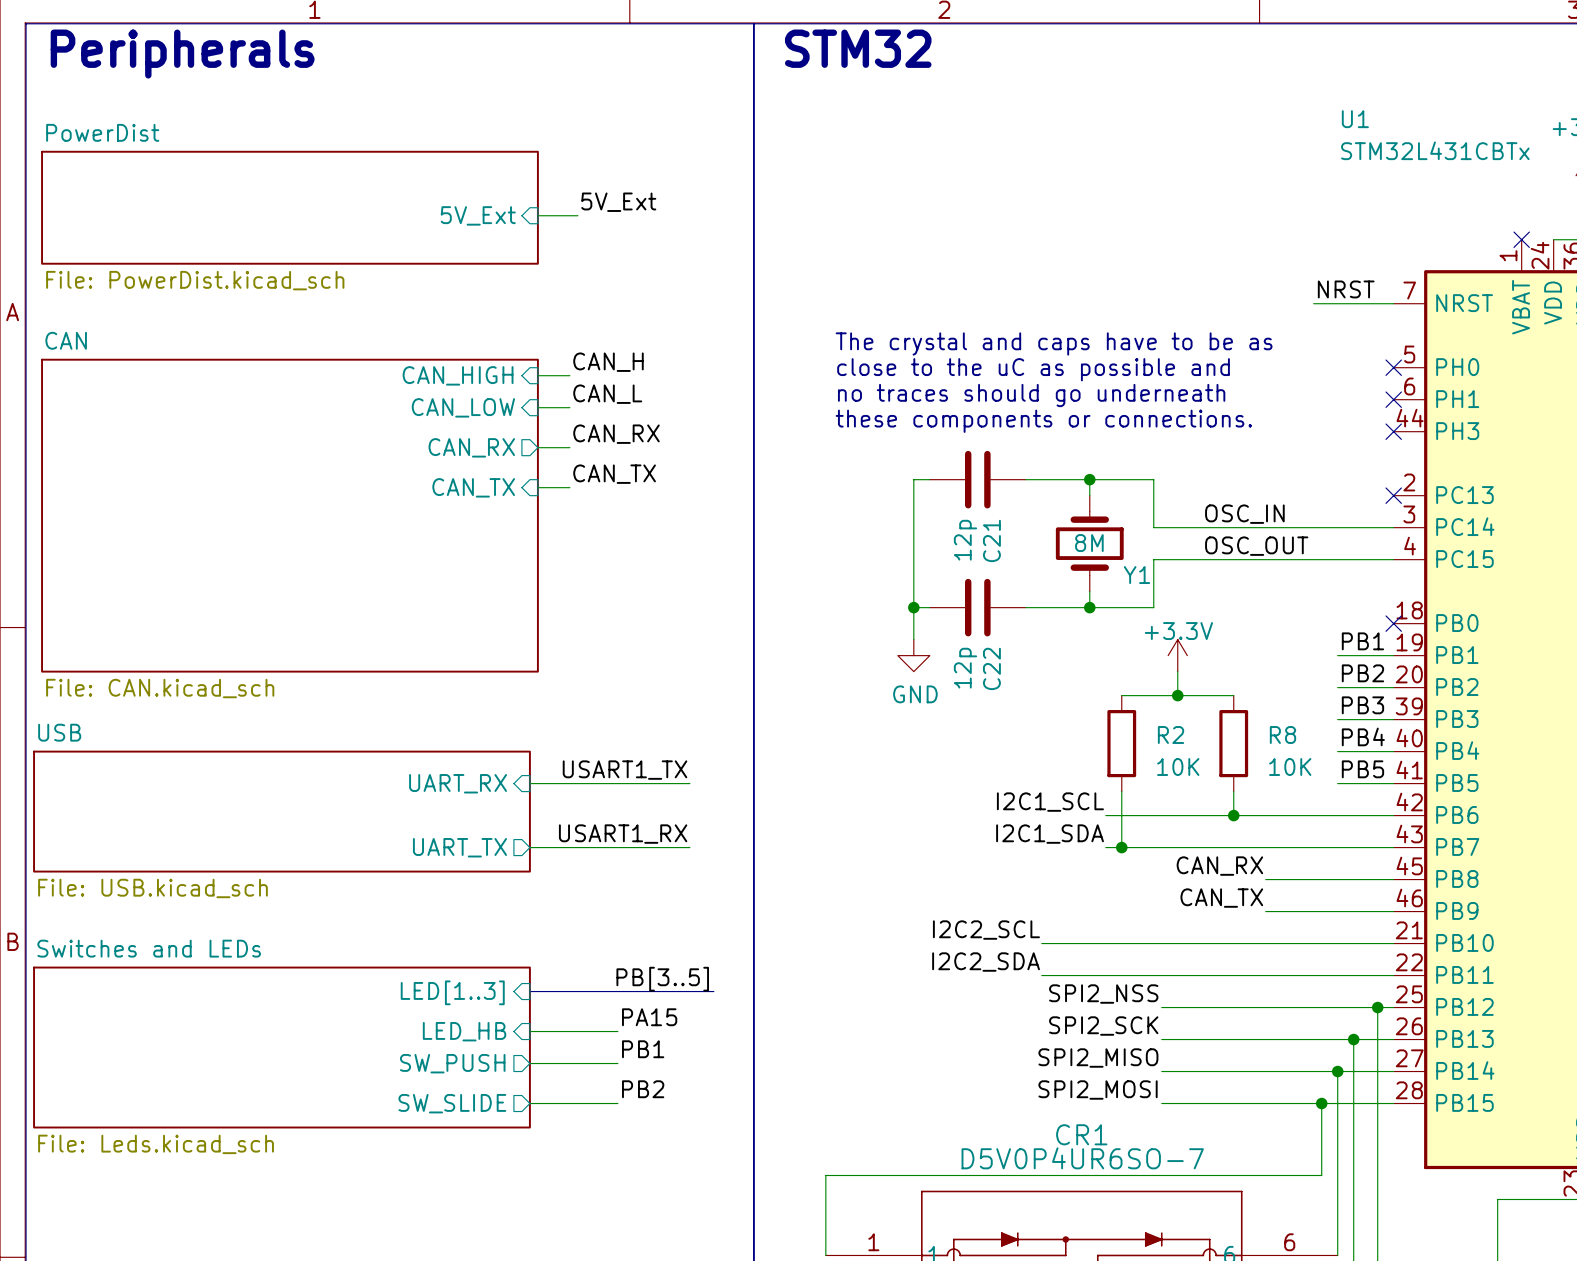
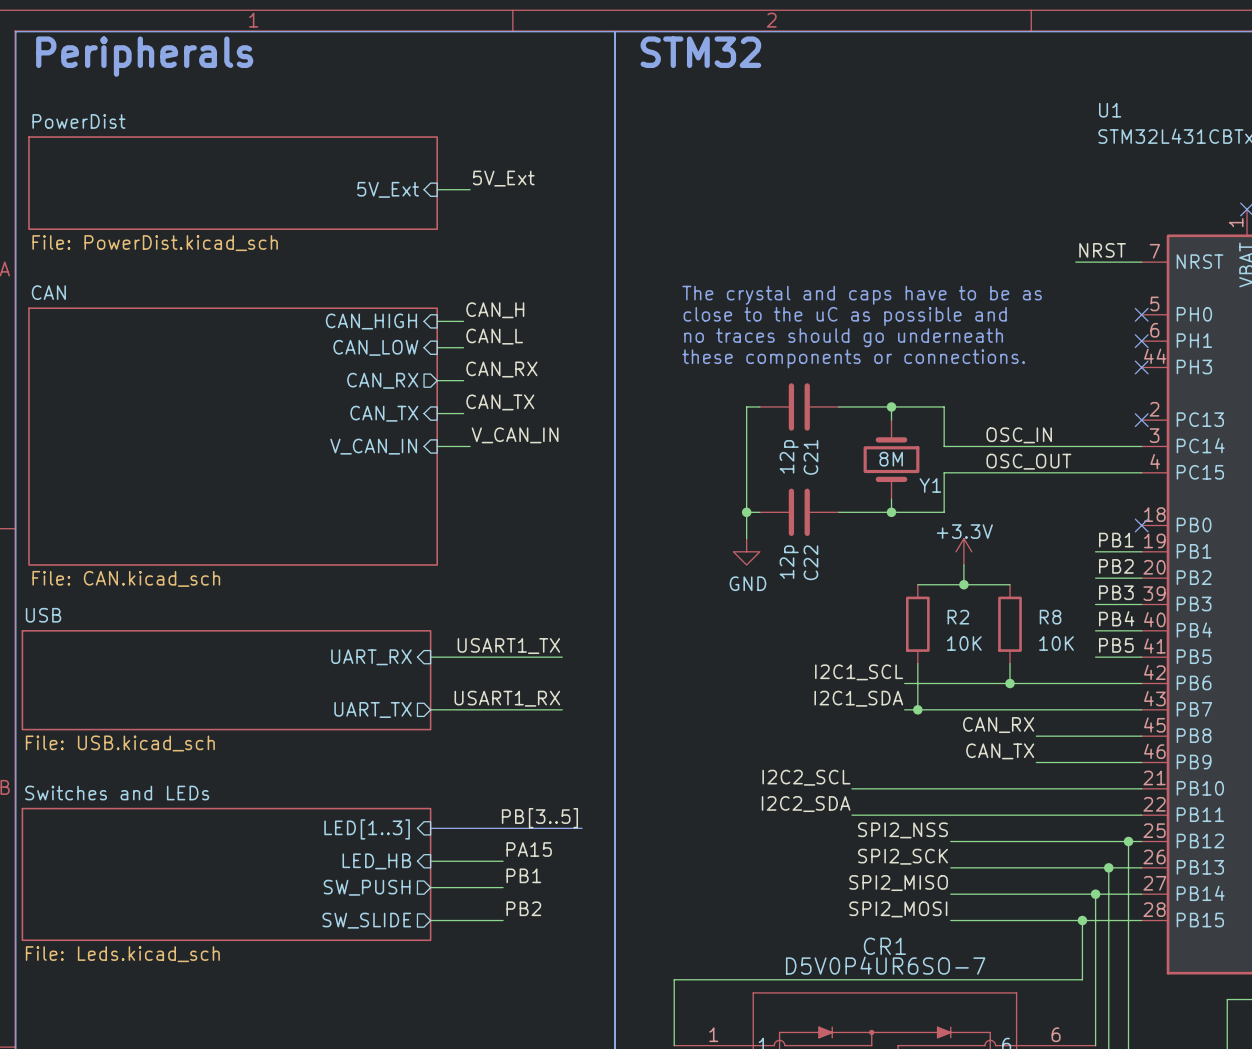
label: none -> V_CAN_IN (515, 435)
sheet pin: none -> V_CAN_IN (373, 446)
wire: none -> (437, 446) (470, 446)

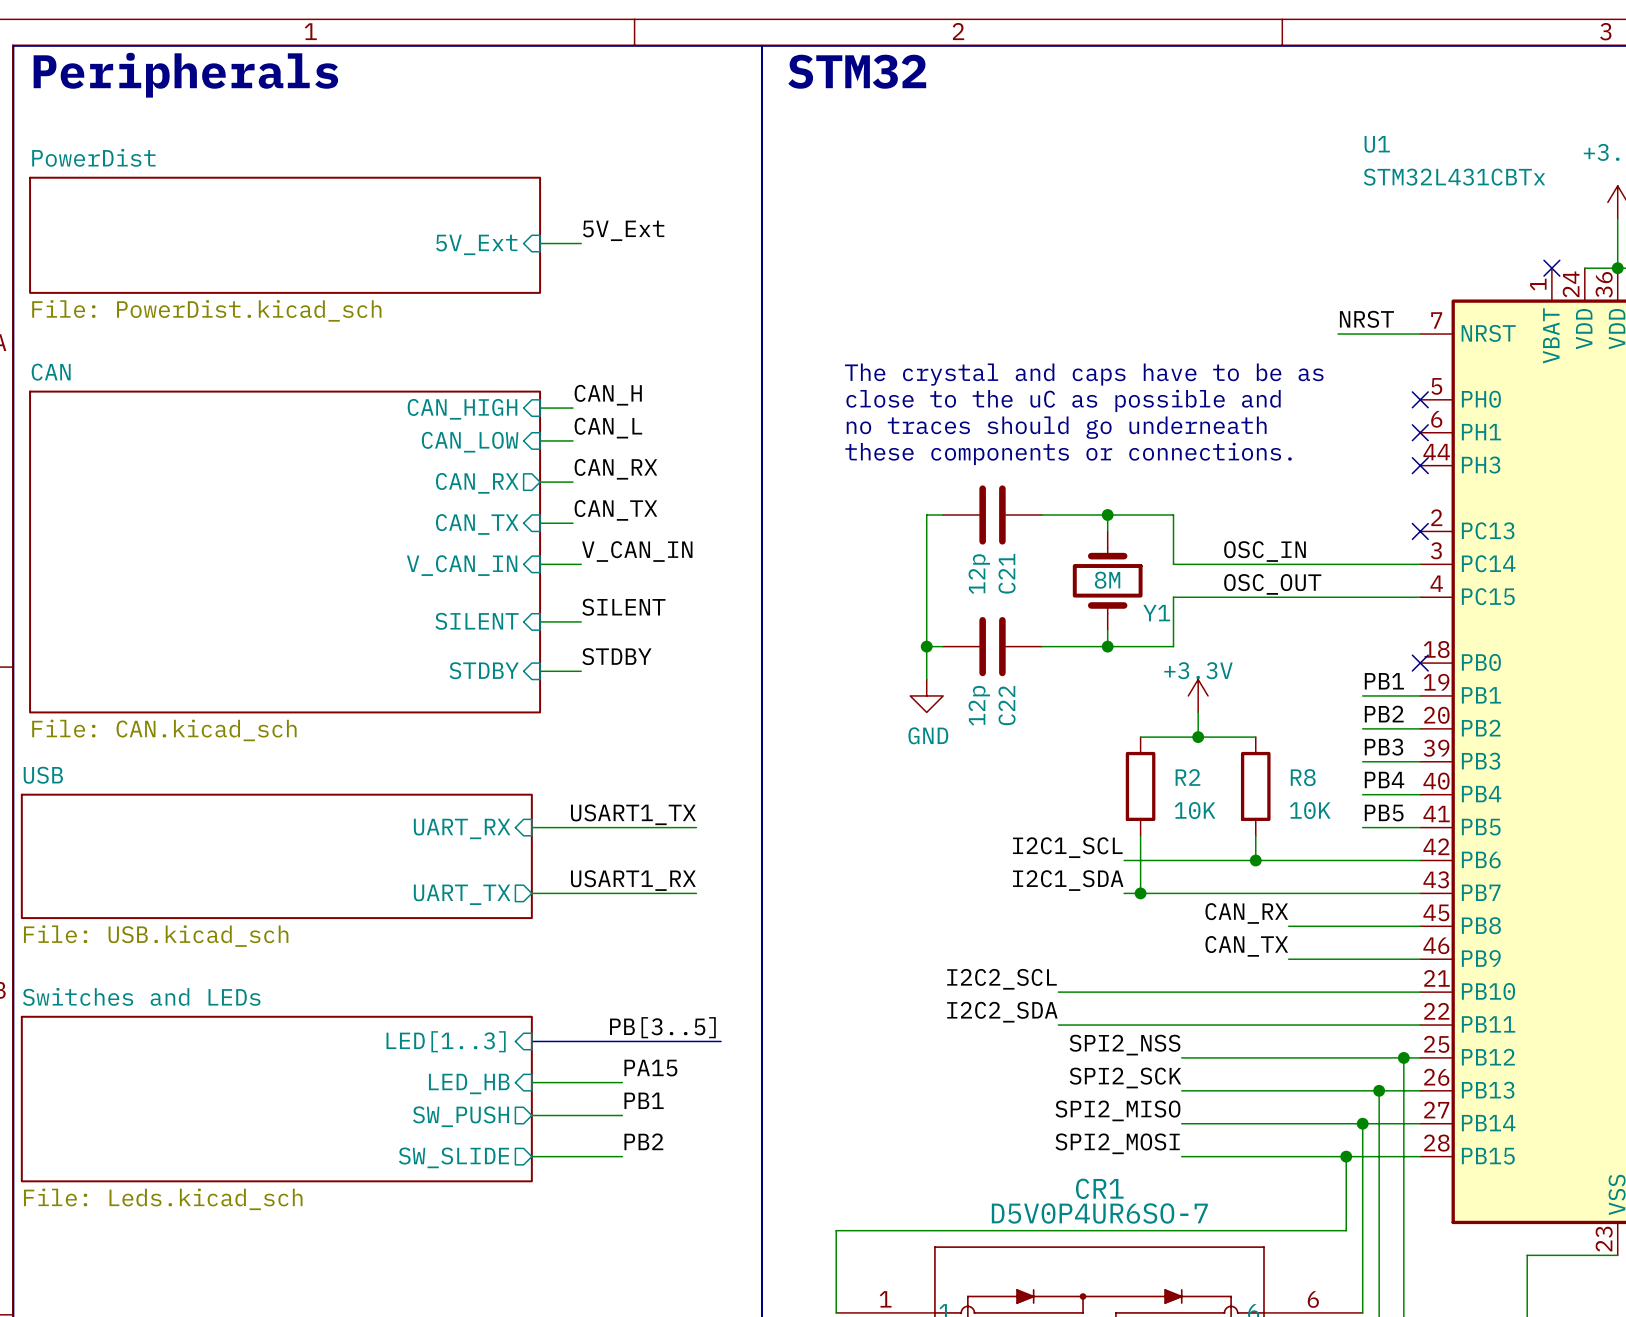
label: none -> SILENT (623, 607)
sheet pin: none -> SILENT (476, 621)
wire: none -> (540, 621) (581, 621)
label: none -> STDBY (616, 656)
sheet pin: none -> STDBY (484, 670)
wire: none -> (540, 671) (581, 671)

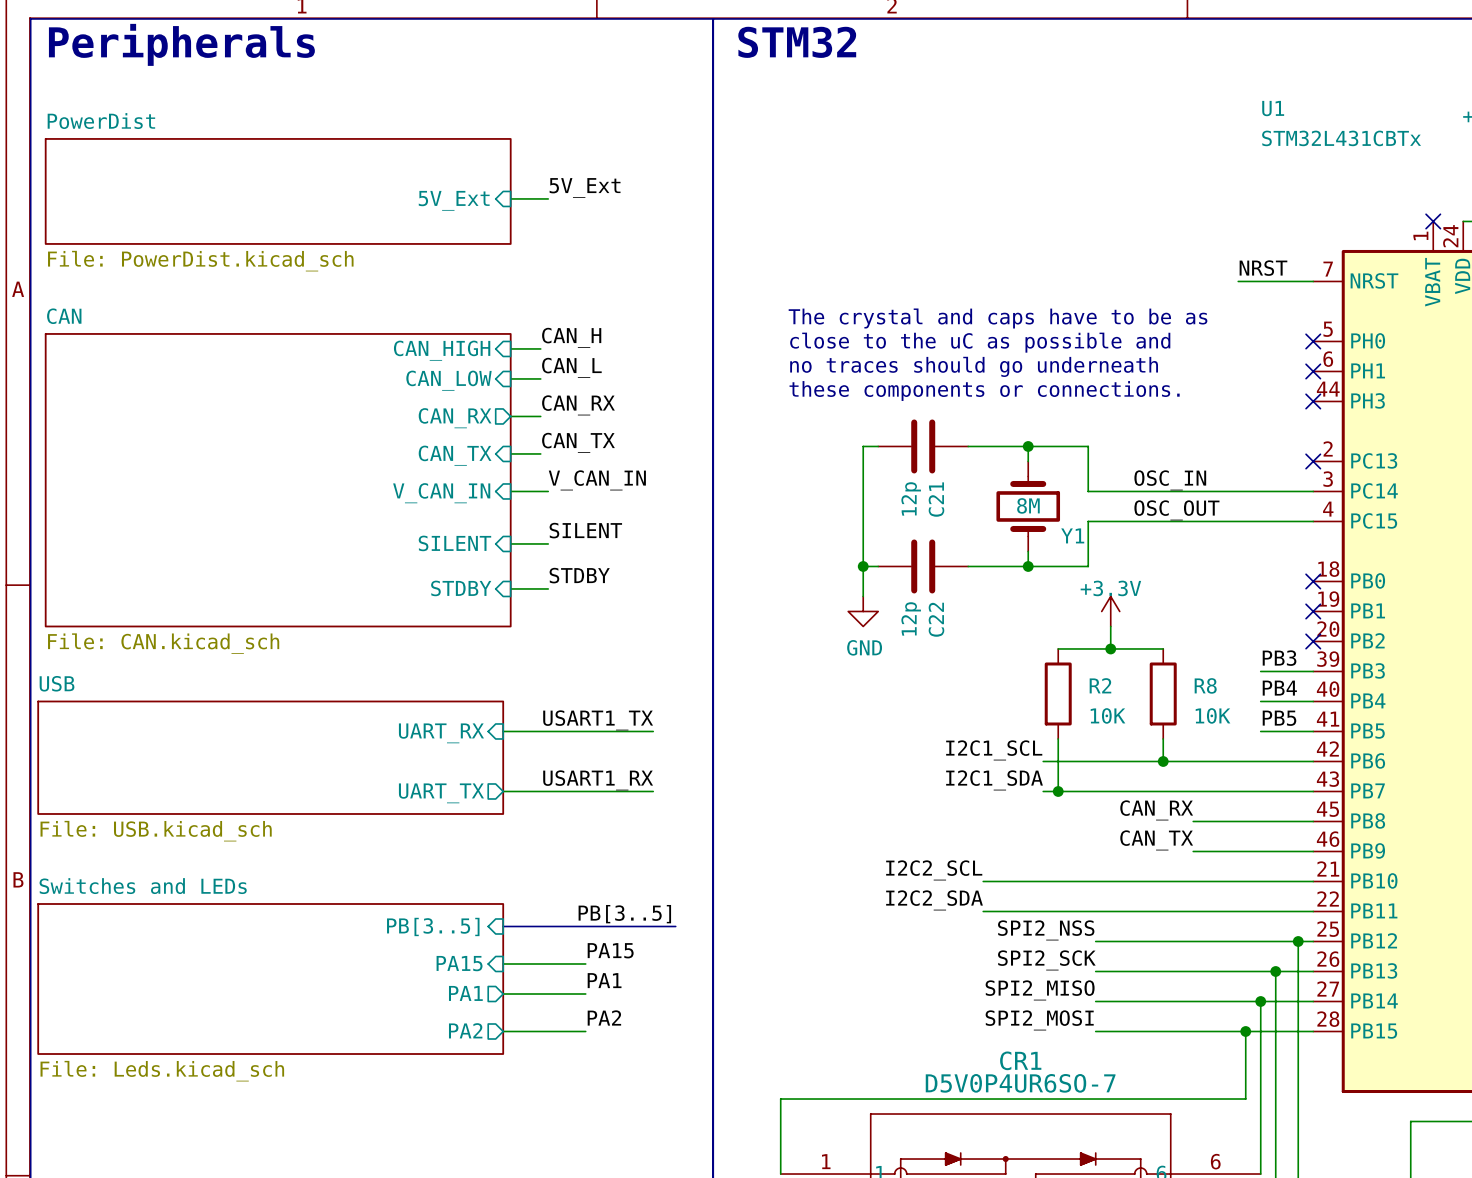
label: PB1 (1384, 681) -> none
wire: (1362, 695) (1420, 695) -> none
no-connect mark: none -> (1313, 611)
label: PB2 (1384, 714) -> none
wire: (1362, 728) (1420, 728) -> none
no-connect mark: none -> (1313, 641)
sheet pin: LED[1..3] (446, 1041) -> PB[3..5] (433, 926)
sheet pin: LED_HB (469, 1083) -> PA15 (459, 963)
label: PB1 (644, 1100) -> PA1 (604, 980)
sheet pin: SW_PUSH (461, 1116) -> PA1 (465, 993)
label: PB2 (643, 1141) -> PA2 (604, 1017)
sheet pin: SW_SLIDE (453, 1157) -> PA2 (465, 1030)

